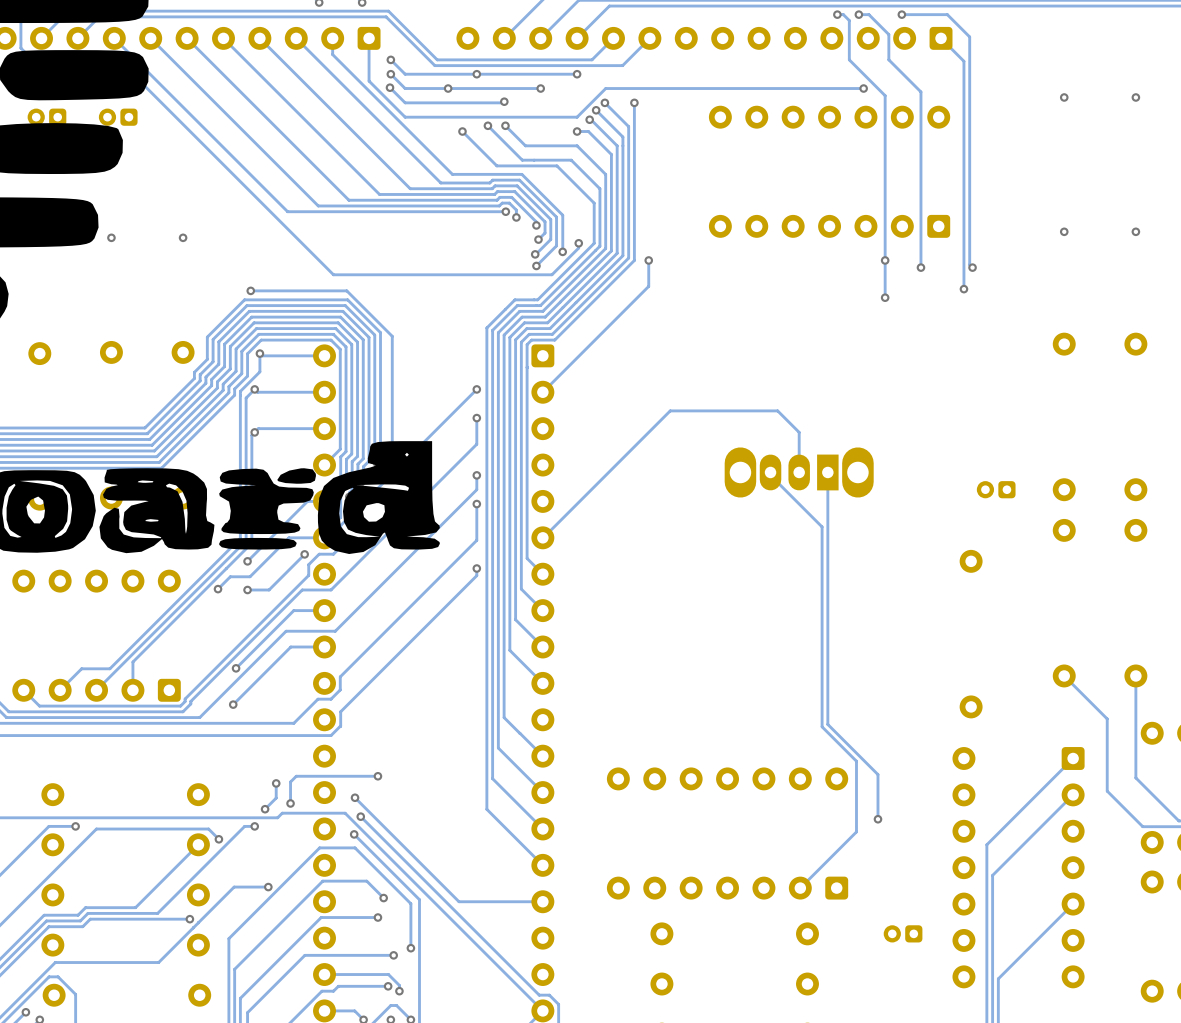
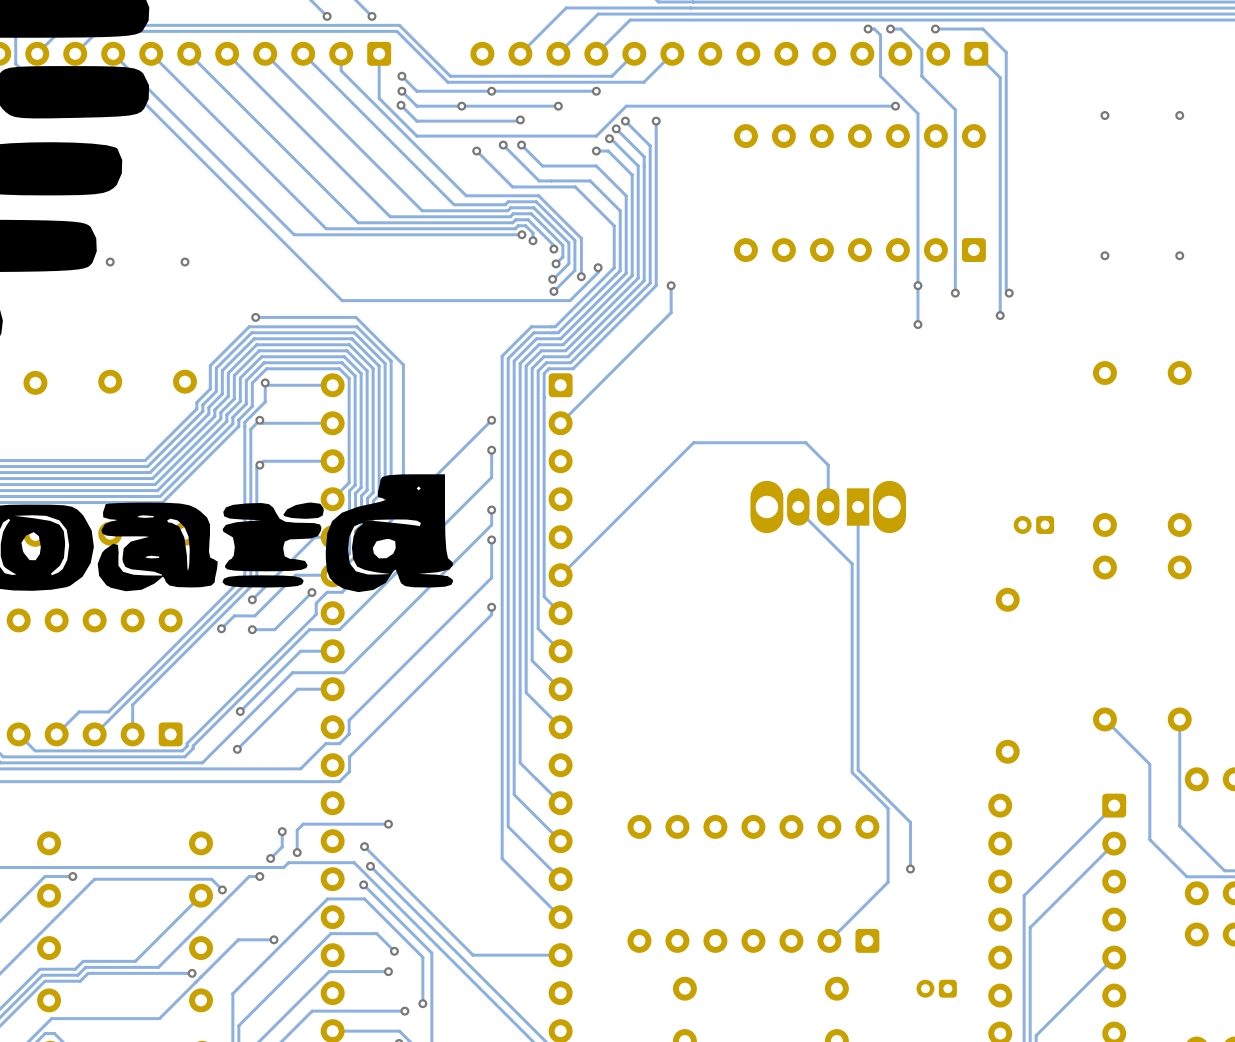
part: (46, 117) -> none
part: (118, 117) -> none

